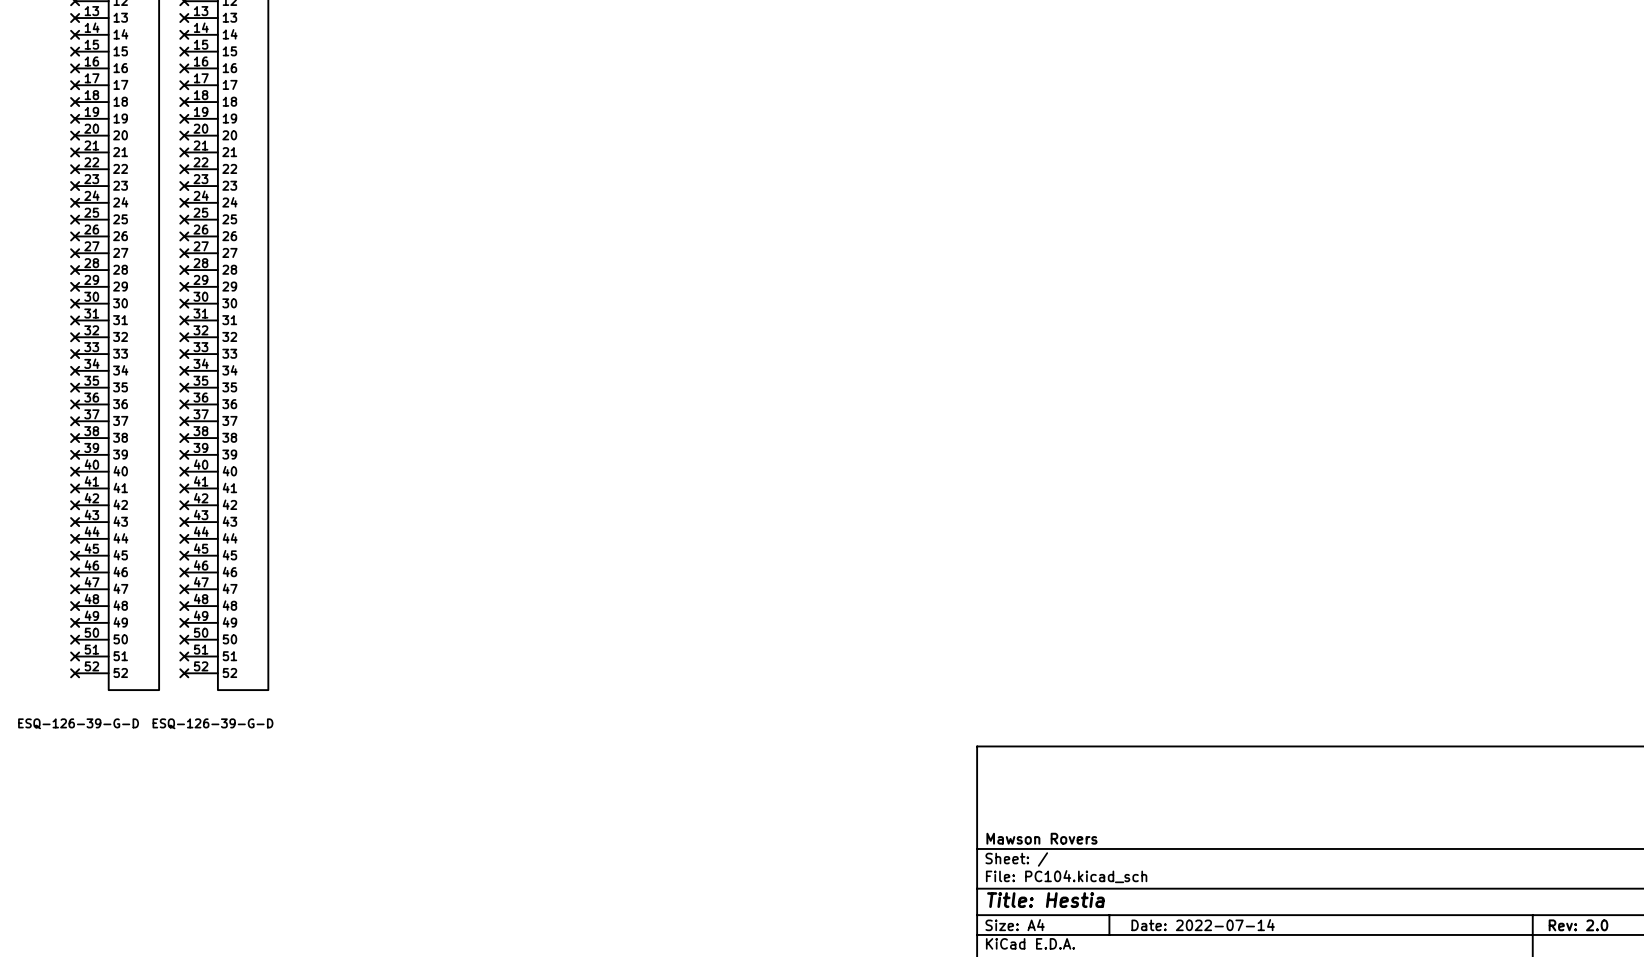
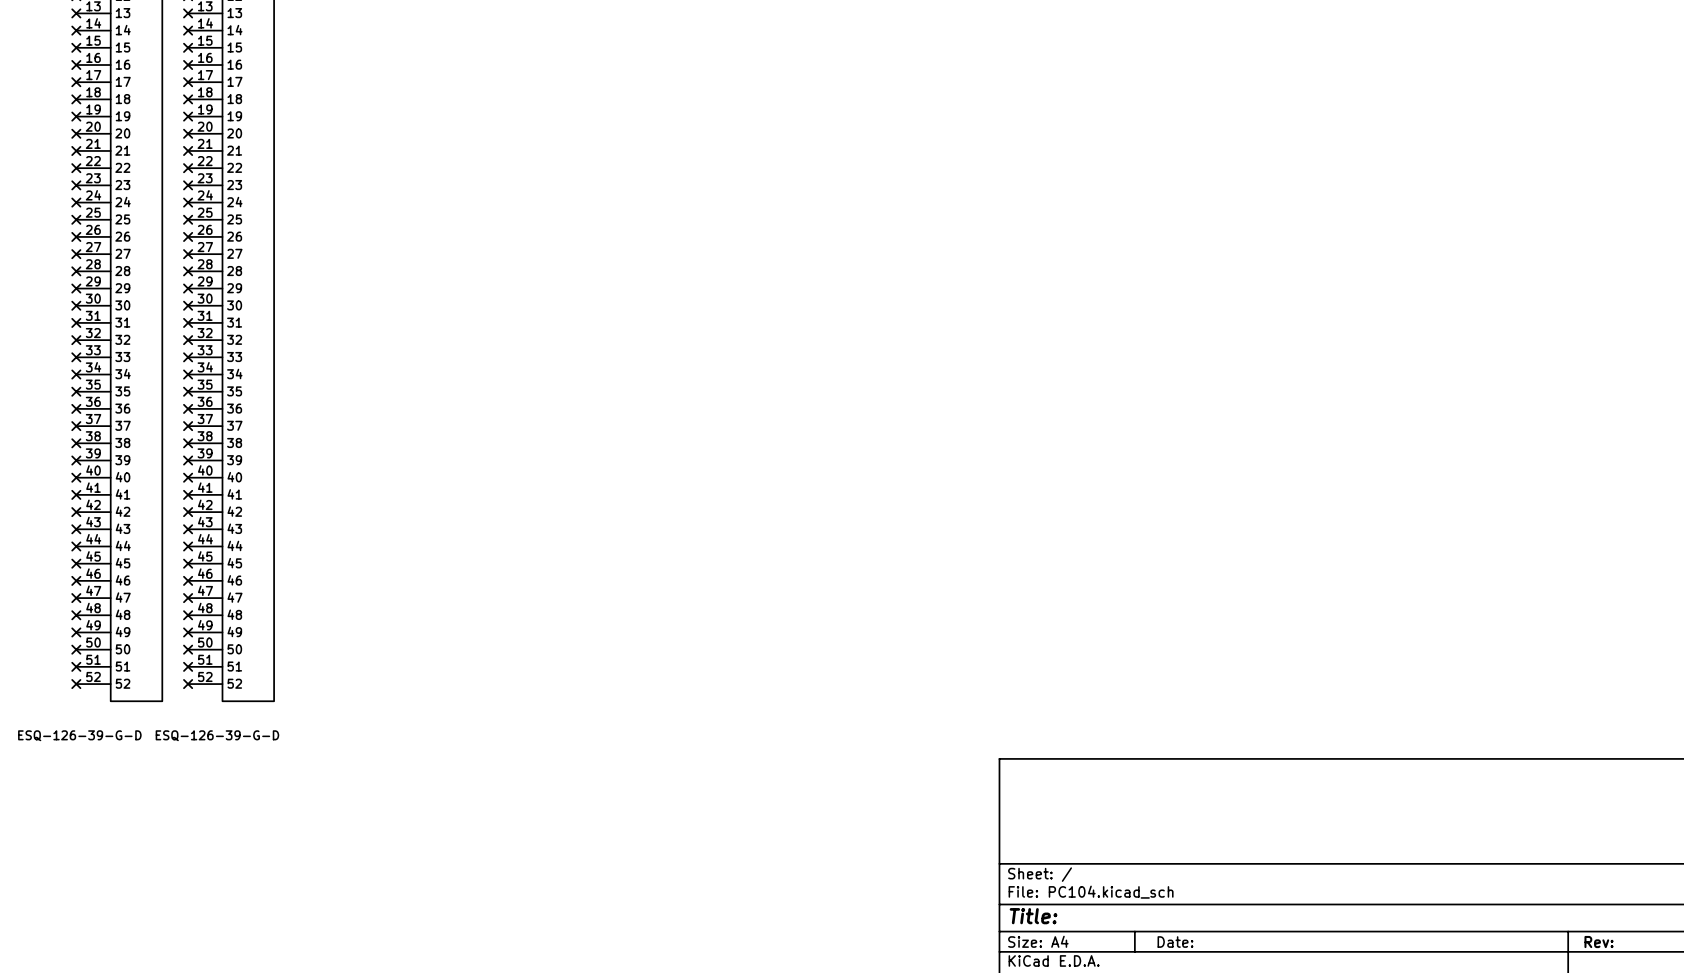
title block: Mawson Rovers (1041, 838) -> none
title block: Title: Hestia (1045, 900) -> Title: (1033, 916)
title block: Date: 2022-07-14 (1203, 925) -> Date: (1175, 942)
title block: Rev: 2.0 (1578, 925) -> Rev: (1599, 942)

